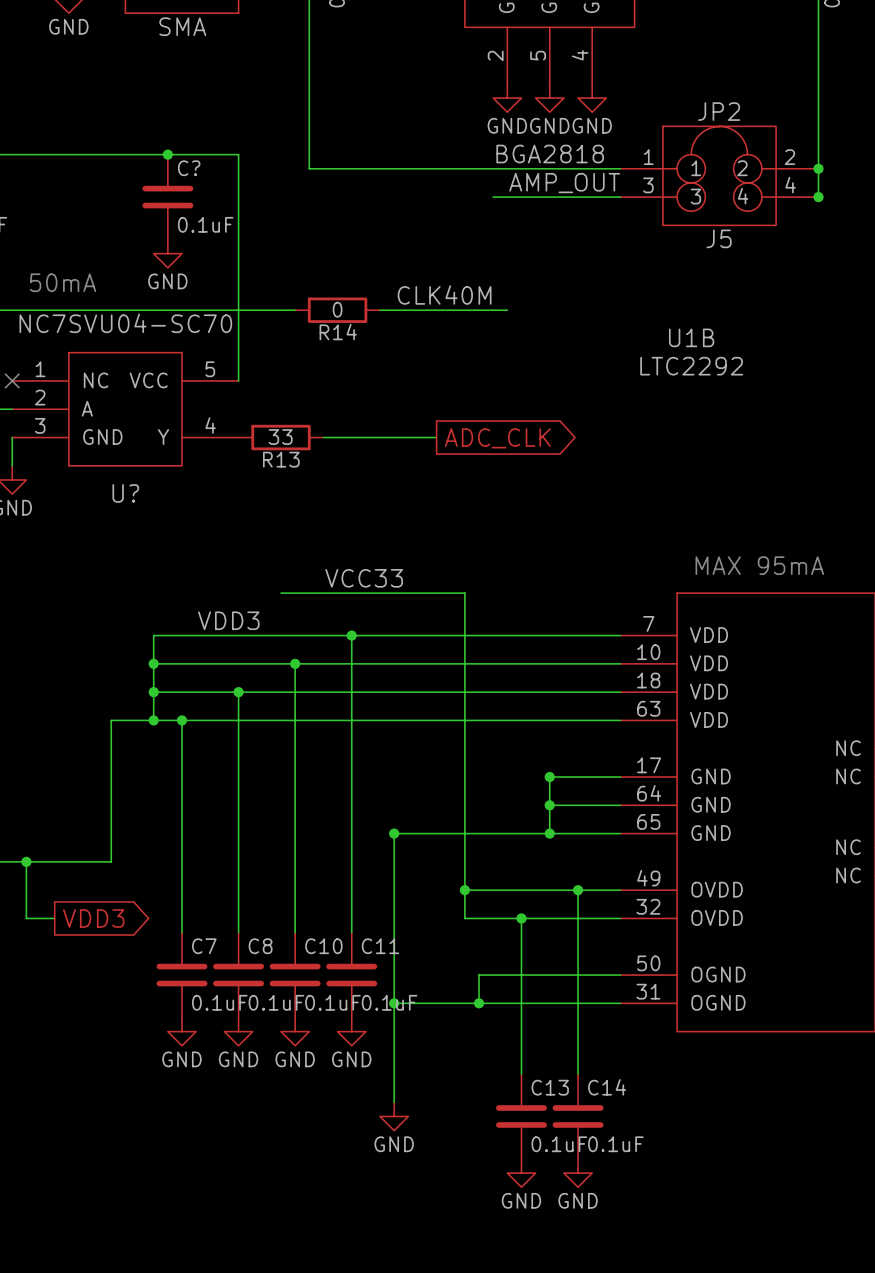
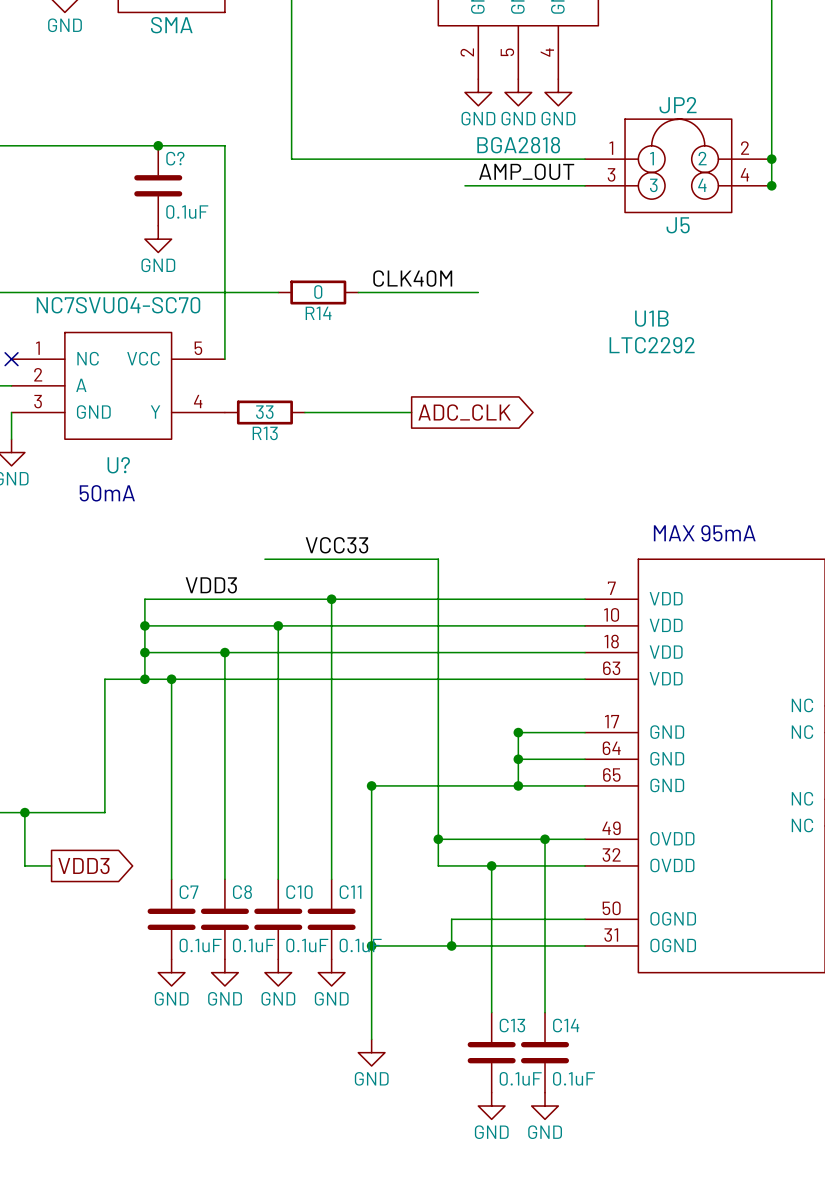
text position: 50mA (63, 282) -> 50mA (107, 493)

